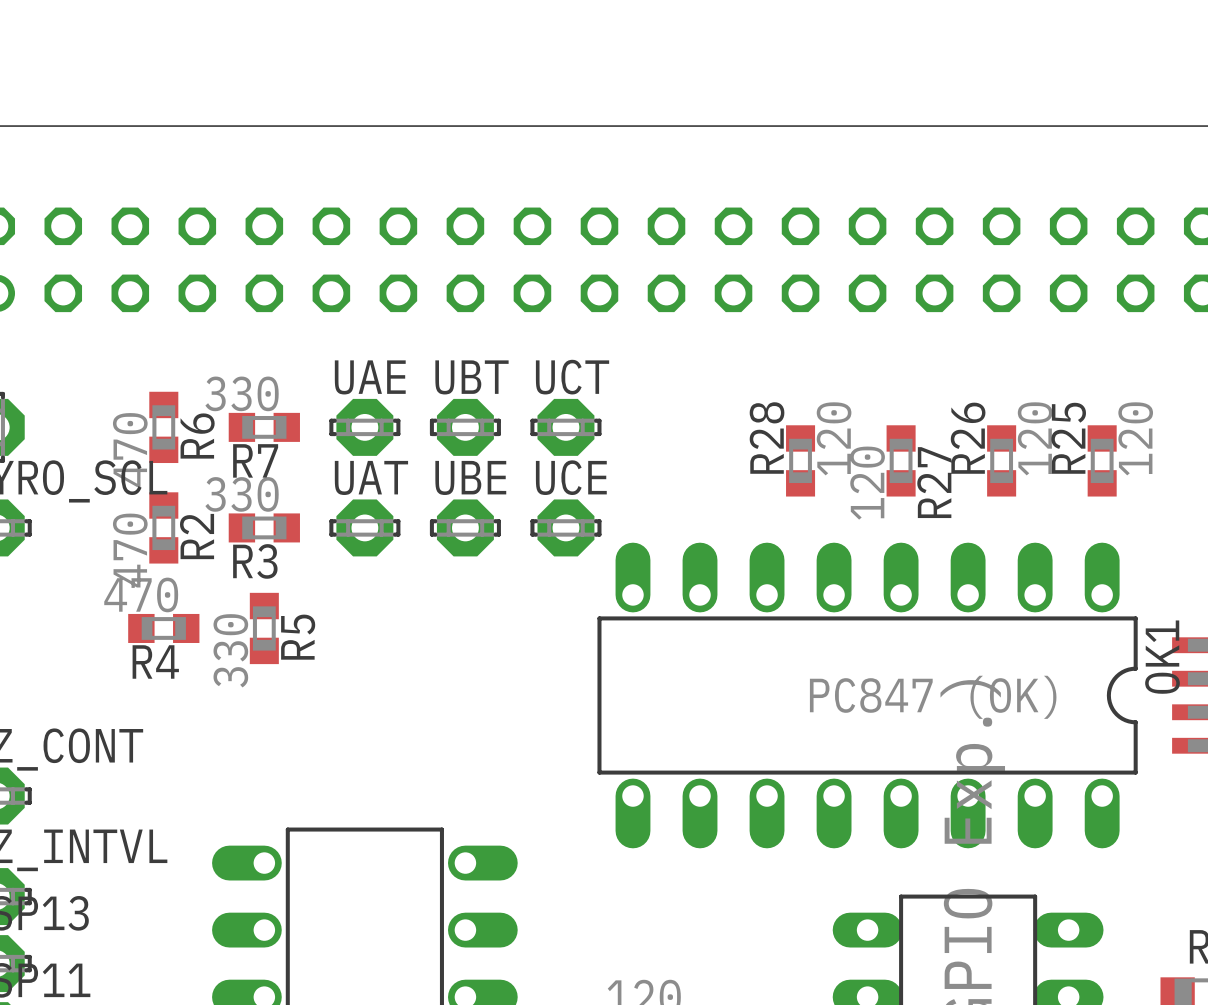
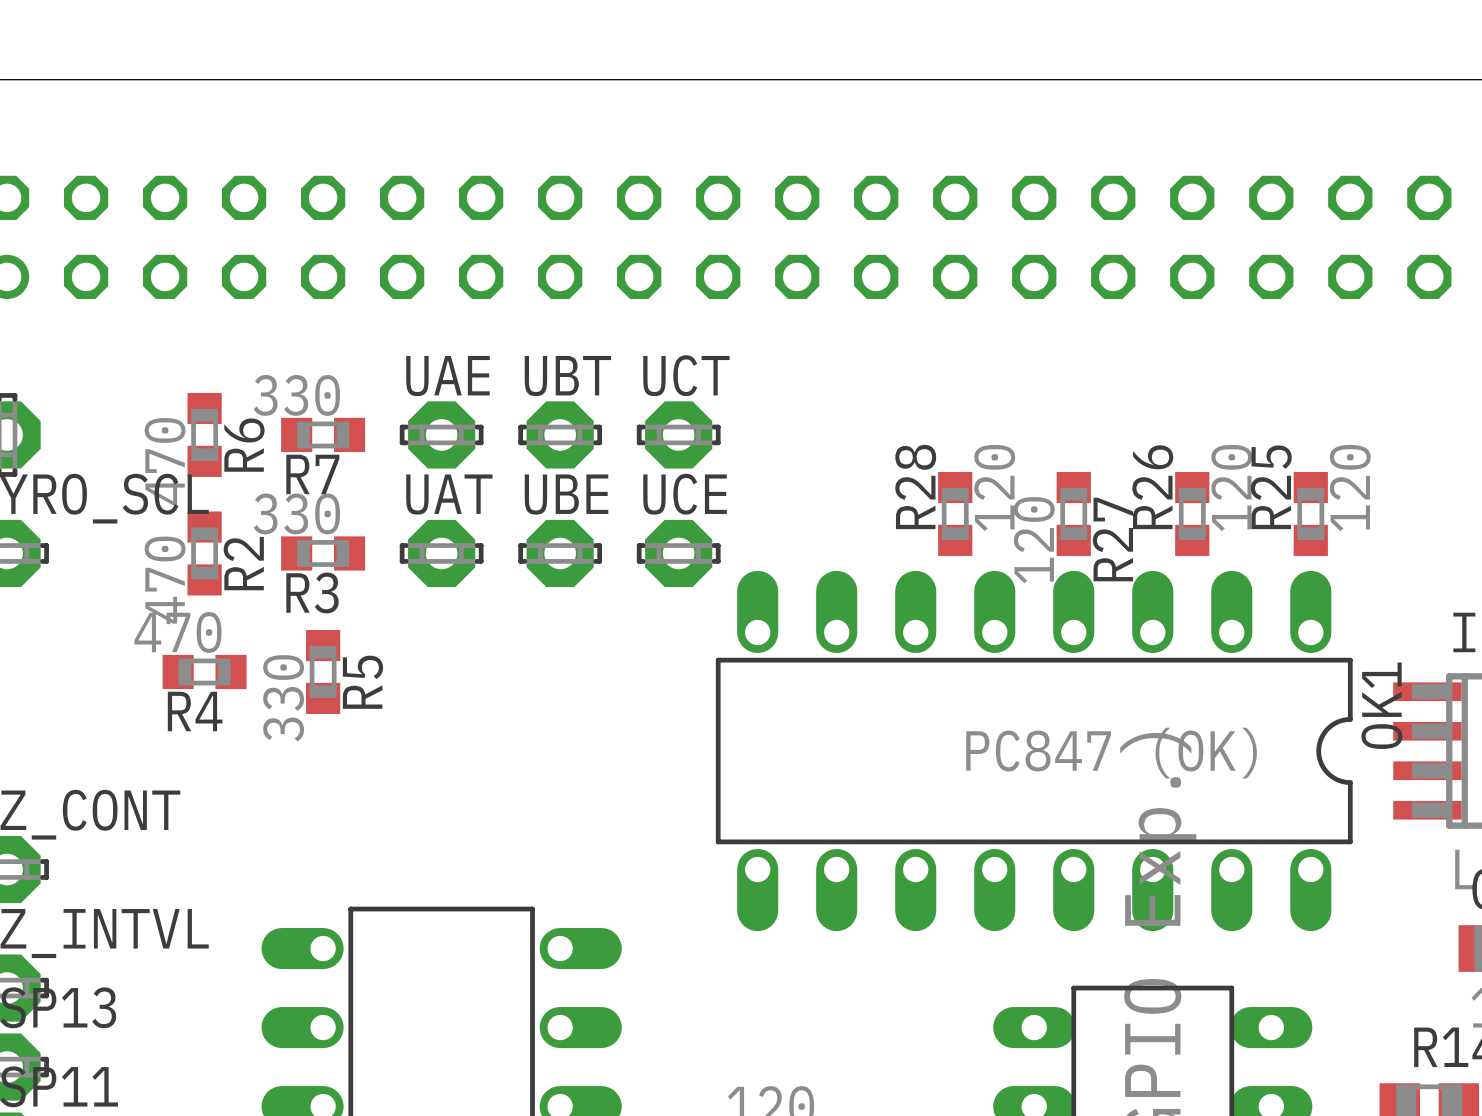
R28 position: (800, 460) -> (955, 513)
R27 position: (901, 460) -> (1073, 513)
R26 position: (1001, 460) -> (1192, 513)
R25 position: (1102, 460) -> (1310, 513)

